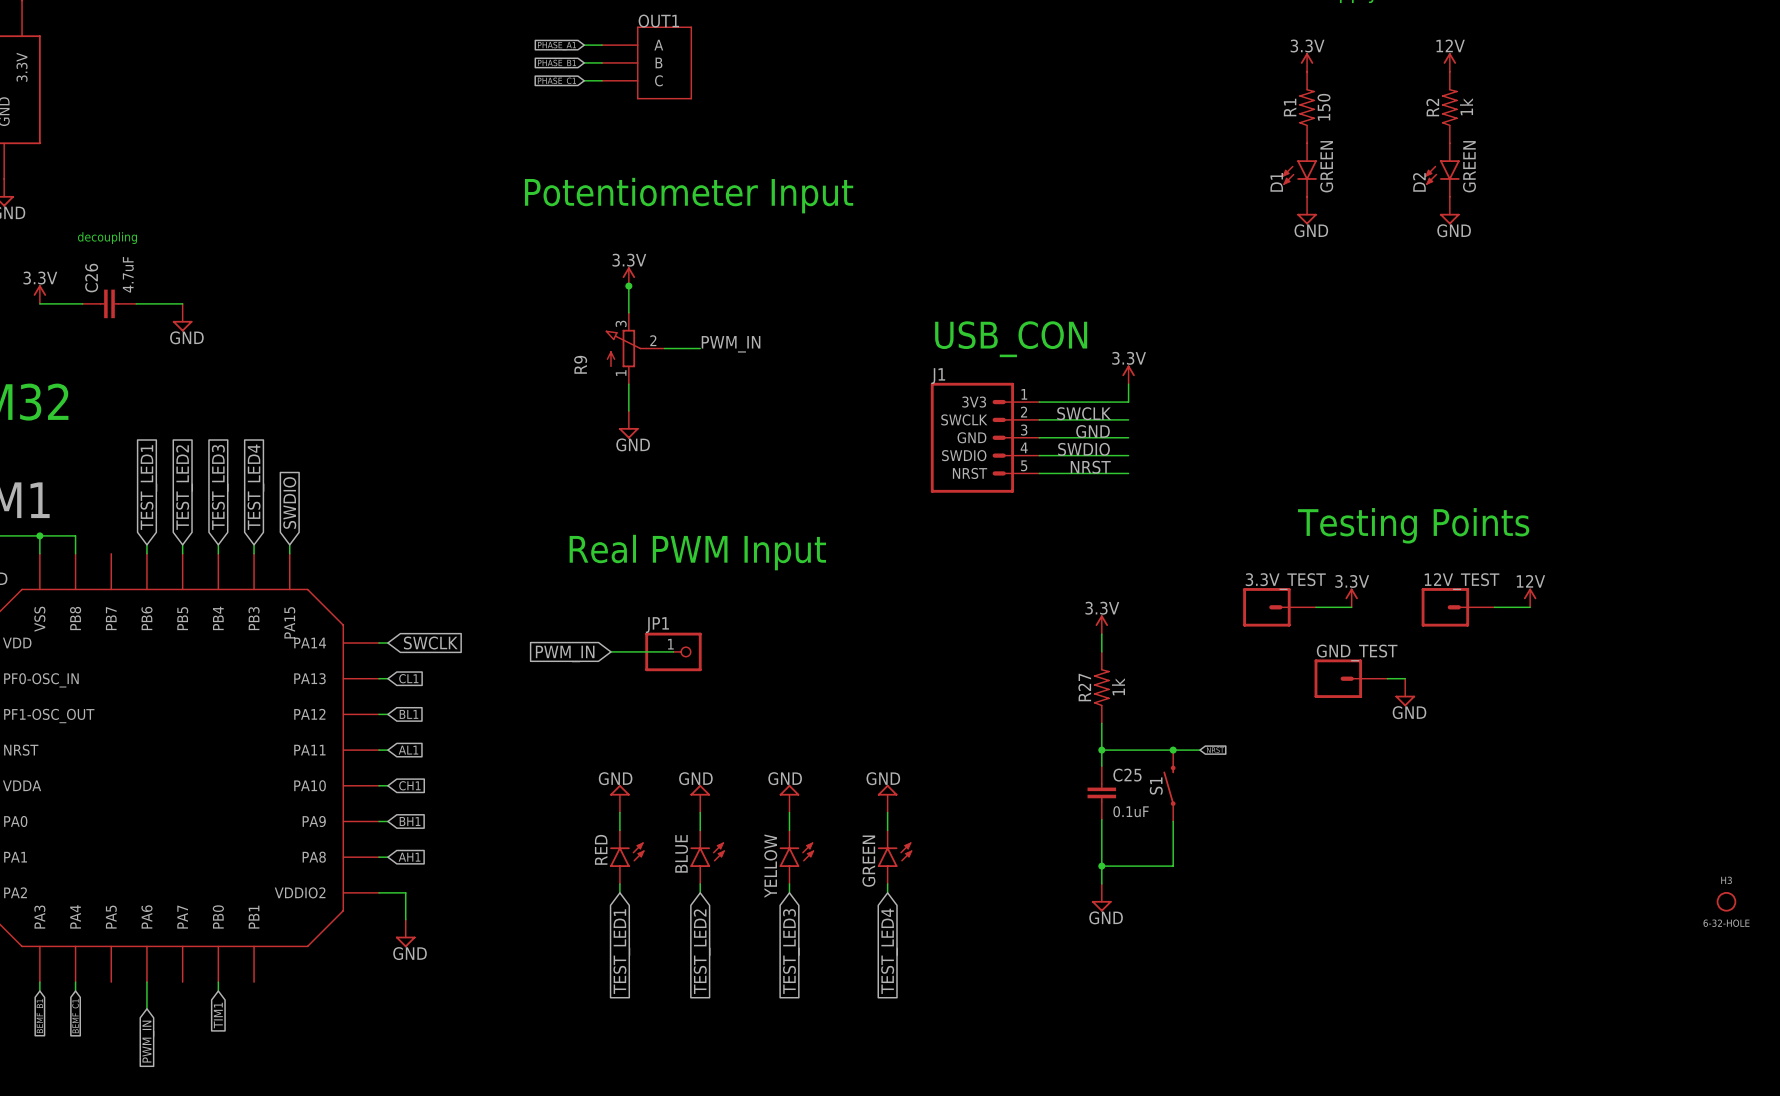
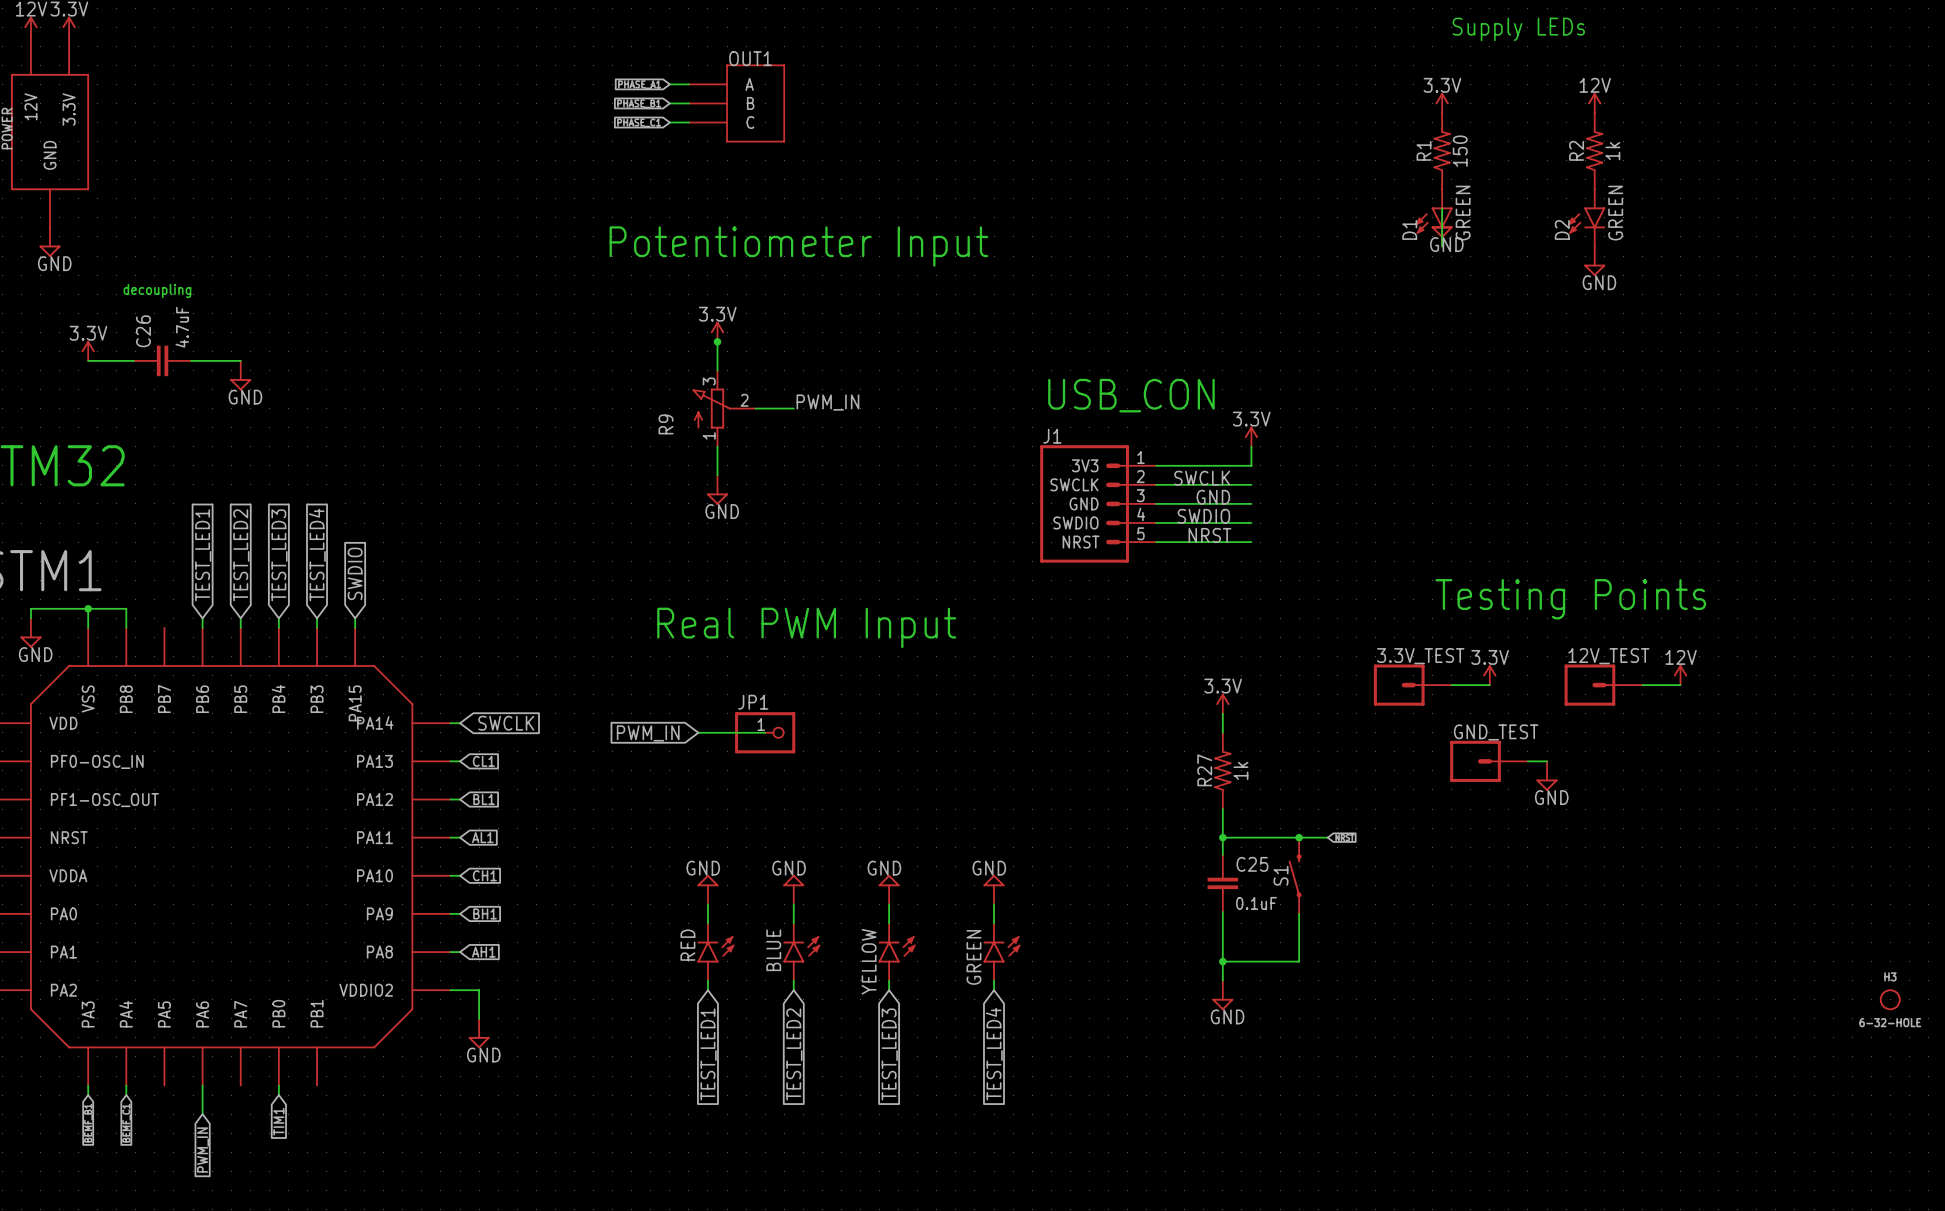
power symbol position: GND (1307, 210) -> GND (1442, 223)

